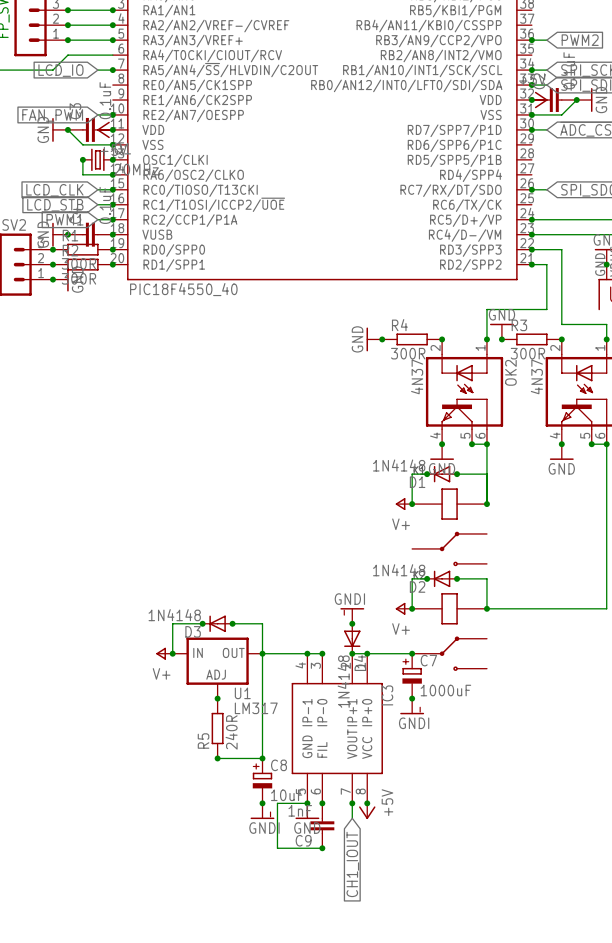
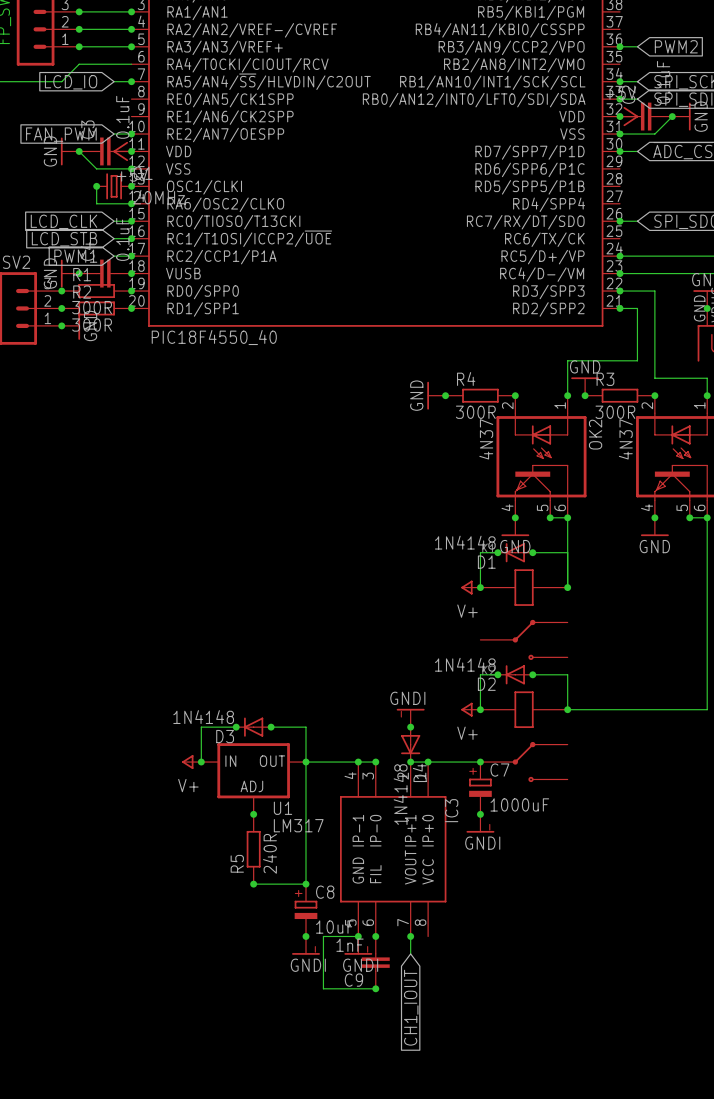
junction: (367, 803) -> none
power symbol: GND (307, 811) -> GNDI (358, 945)
power symbol: +5V (367, 811) -> none

